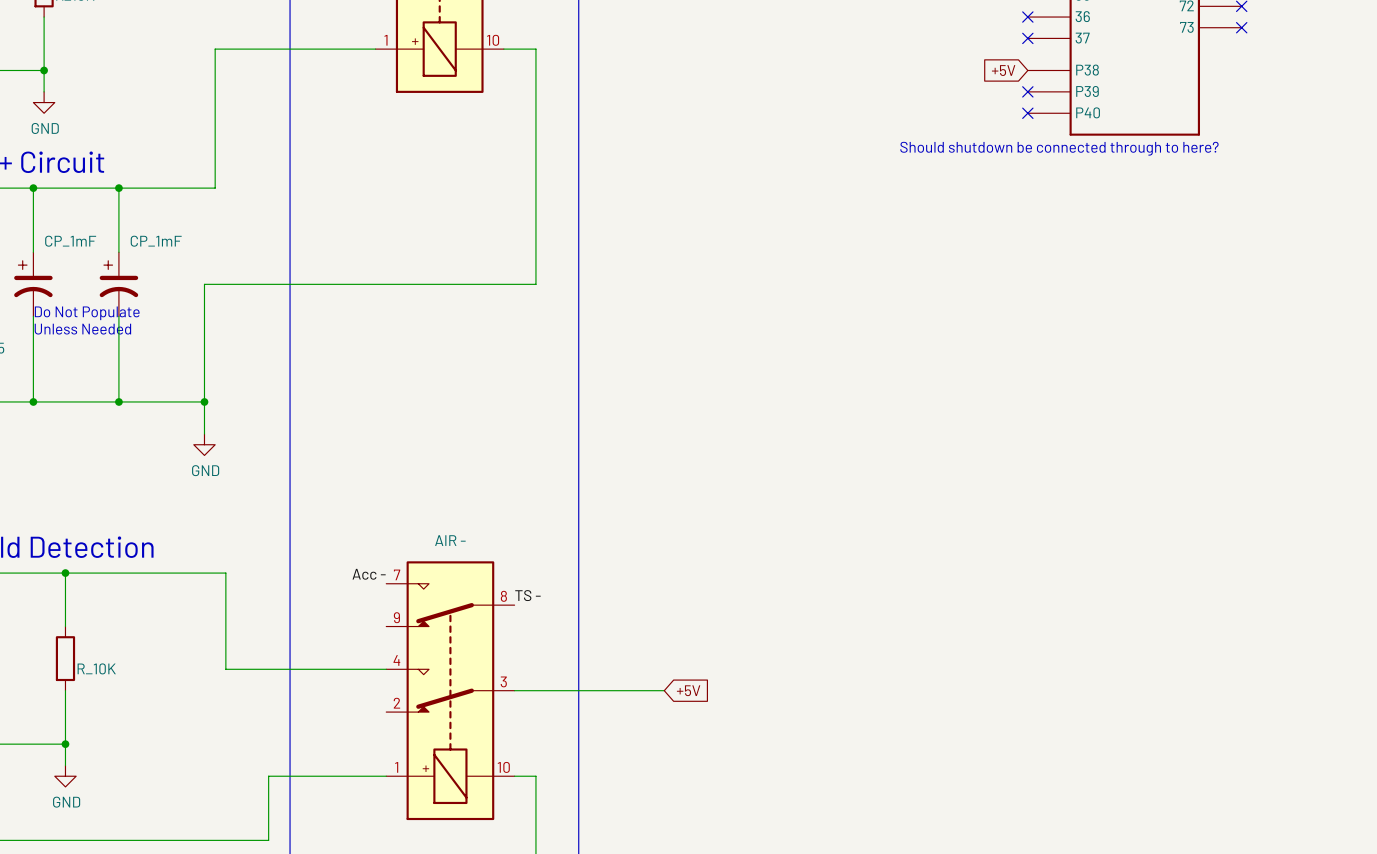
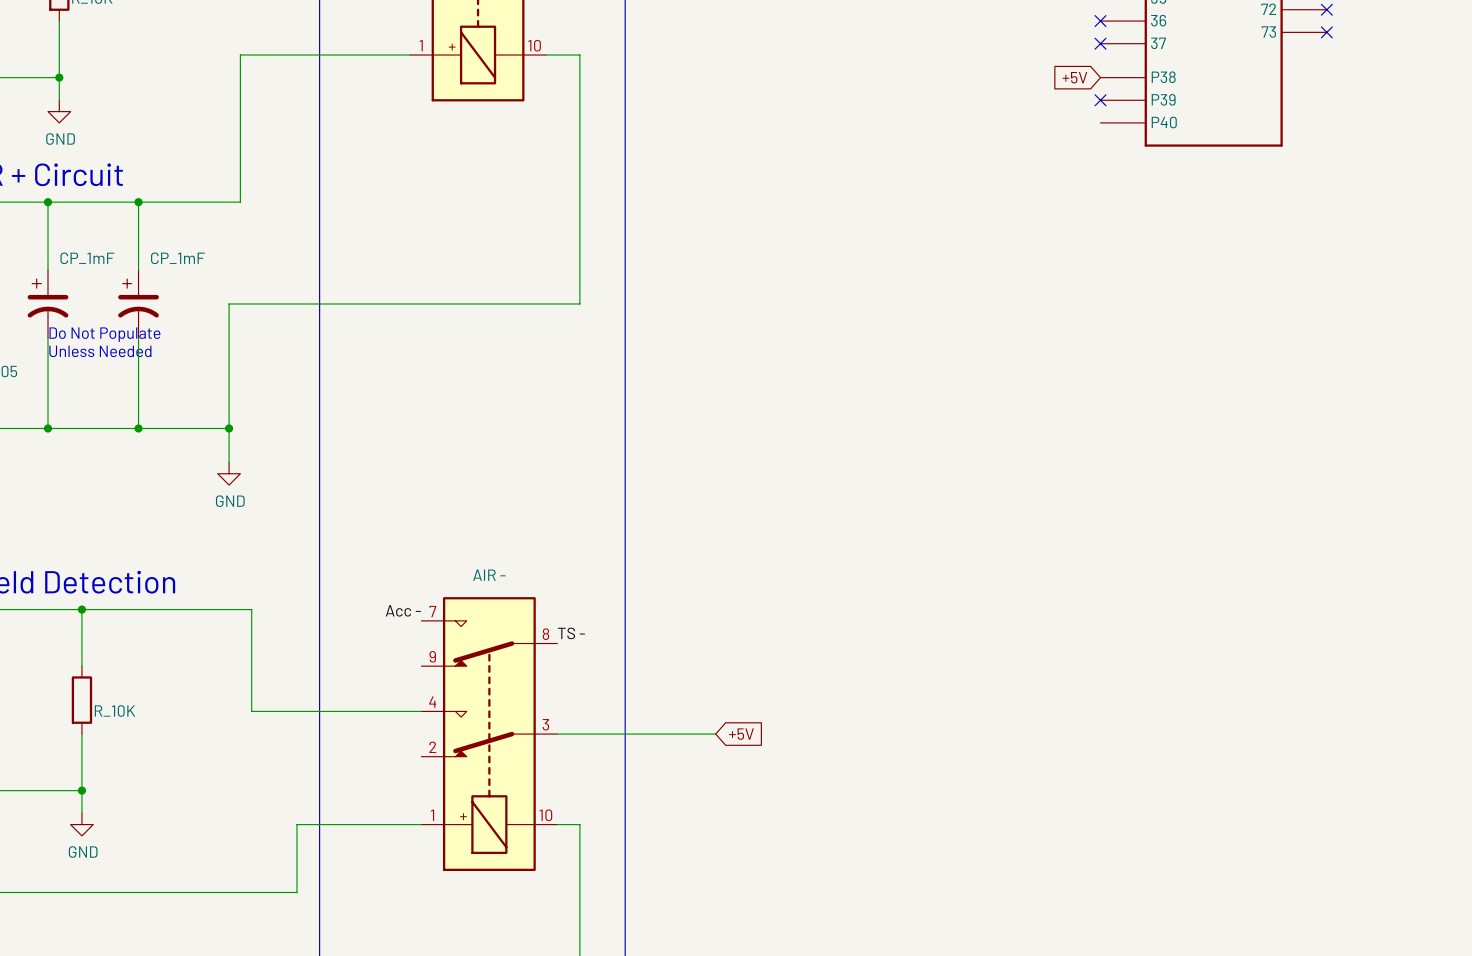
no-connect mark: (1027, 113) -> none
text: Should shutdown be connected through to here? (1059, 148) -> none

